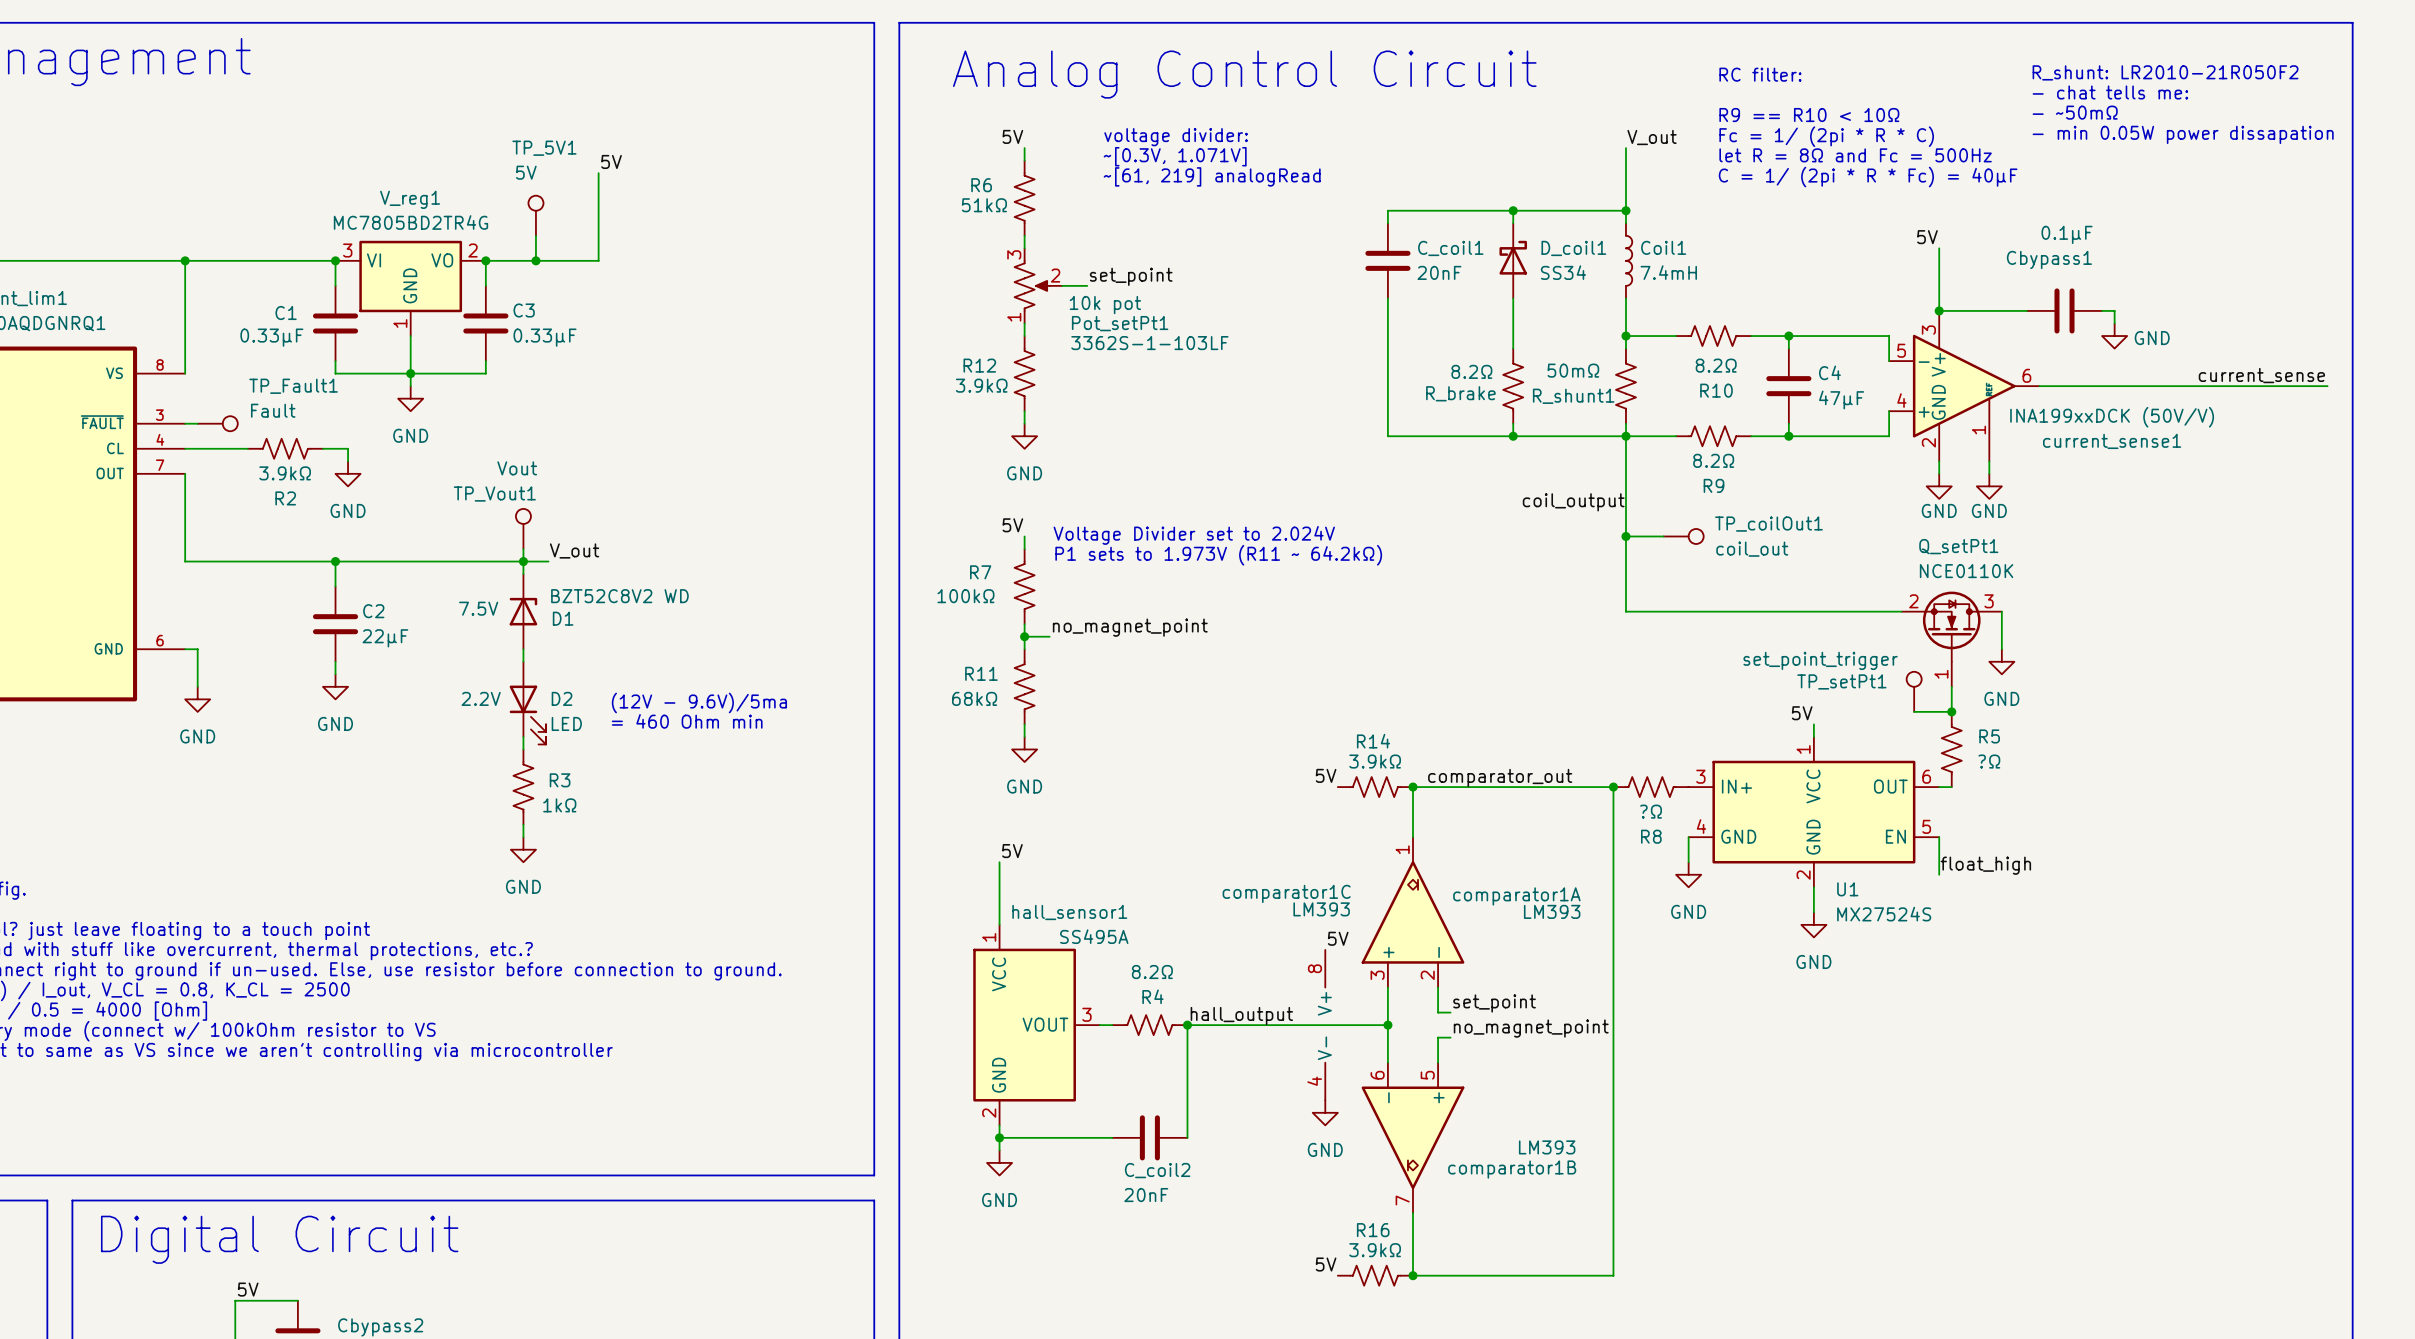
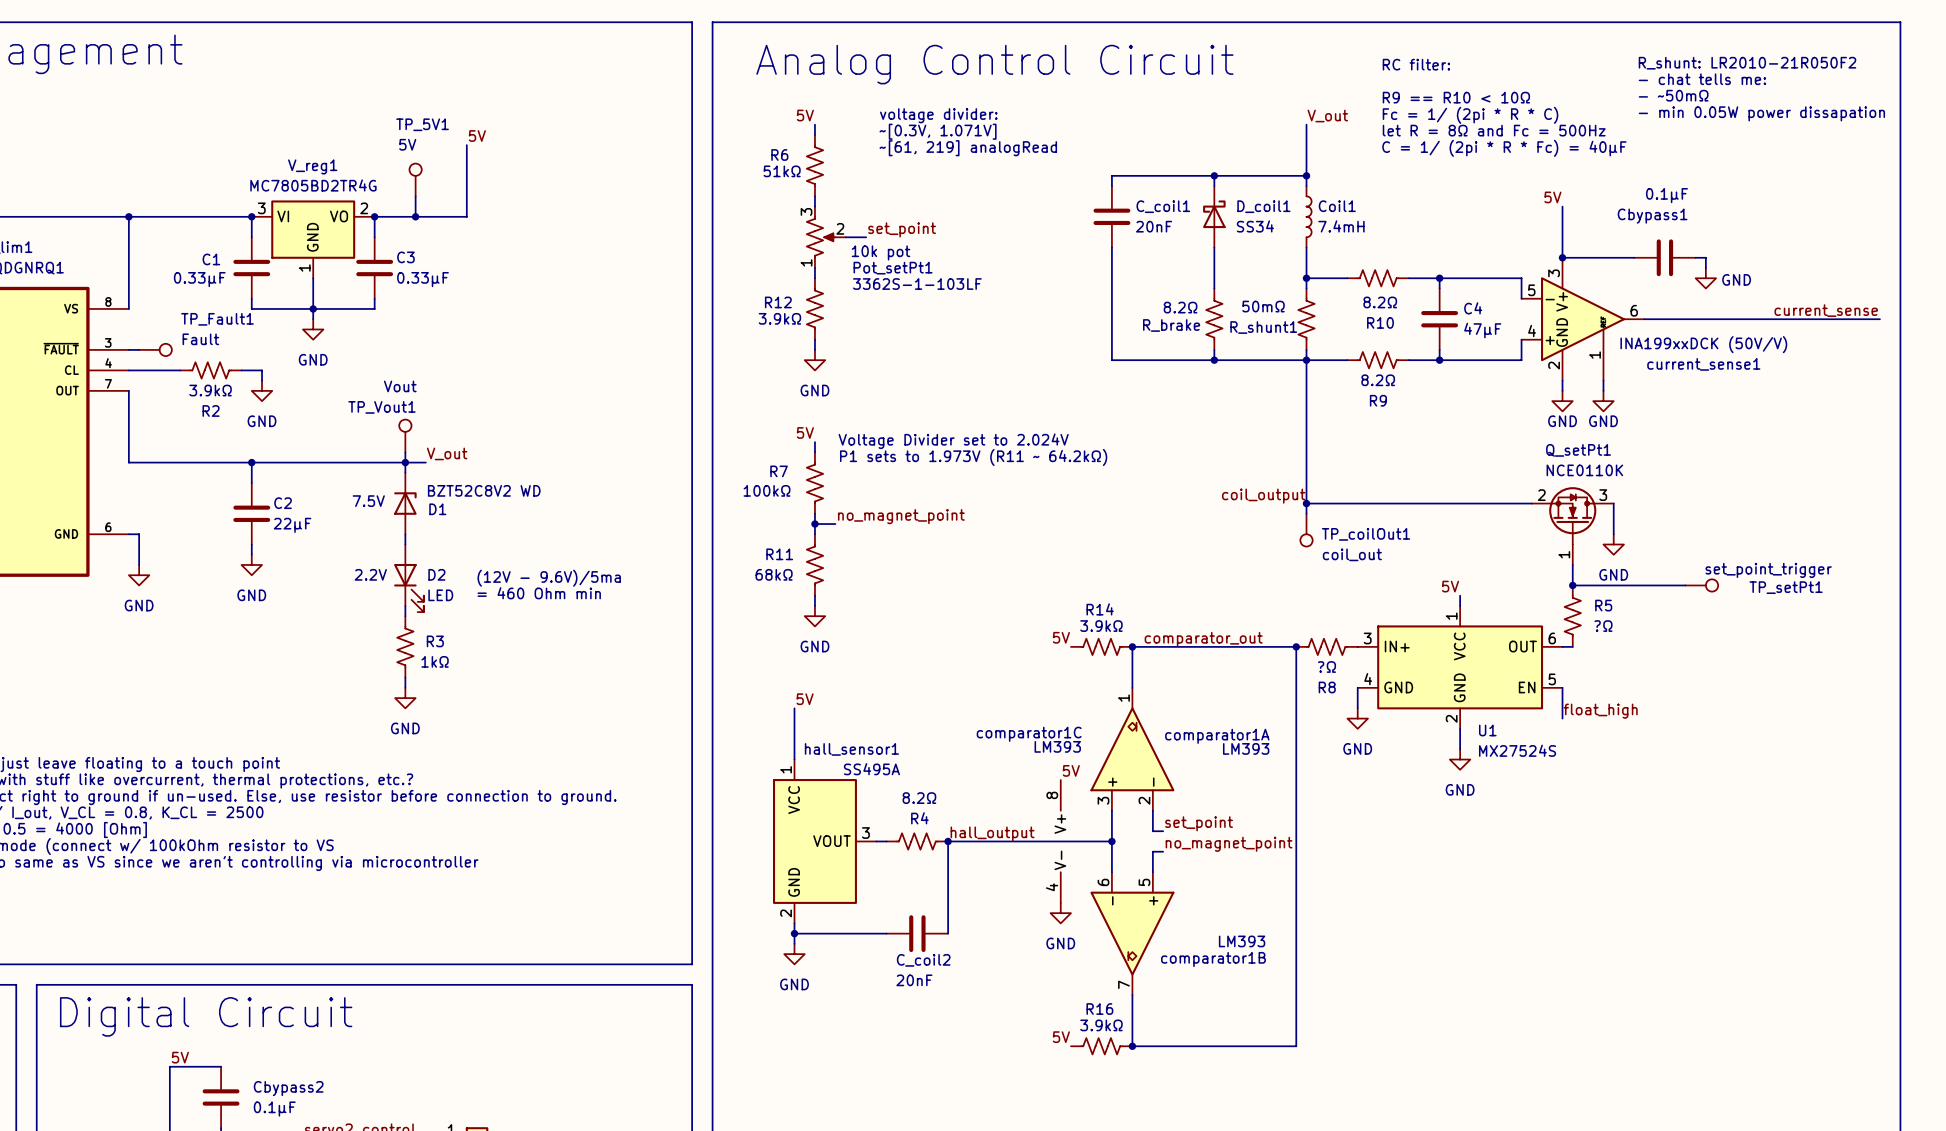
label position: coil_output (1573, 502) -> coil_output (1263, 496)
TP_coilOut1 name position: TP_coilOut1 (1768, 524) -> TP_coilOut1 (1366, 534)
wire: (1625, 536) (1663, 536) -> none
junction: (1625, 536) -> none
TP_coilOut1 position: (1683, 536) -> (1306, 530)
TP_coilOut1 rotation: 0° (1696, 536) -> 90° clockwise (1306, 540)
TP_coilOut1 value position: coil_out (1752, 549) -> coil_out (1352, 554)
wire: none -> (1306, 503) (1306, 513)
junction: none -> (1306, 503)
TP_setPt1 value position: set_point_trigger (1820, 660) -> set_point_trigger (1768, 570)
TP_setPt1 rotation: 0° (1914, 679) -> 90° clockwise (1712, 585)
TP_setPt1 name position: TP_setPt1 (1841, 681) -> TP_setPt1 (1786, 587)
TP_setPt1 position: (1914, 691) -> (1701, 585)
wire: (1914, 711) (1951, 711) -> (1685, 585) (1572, 585)

